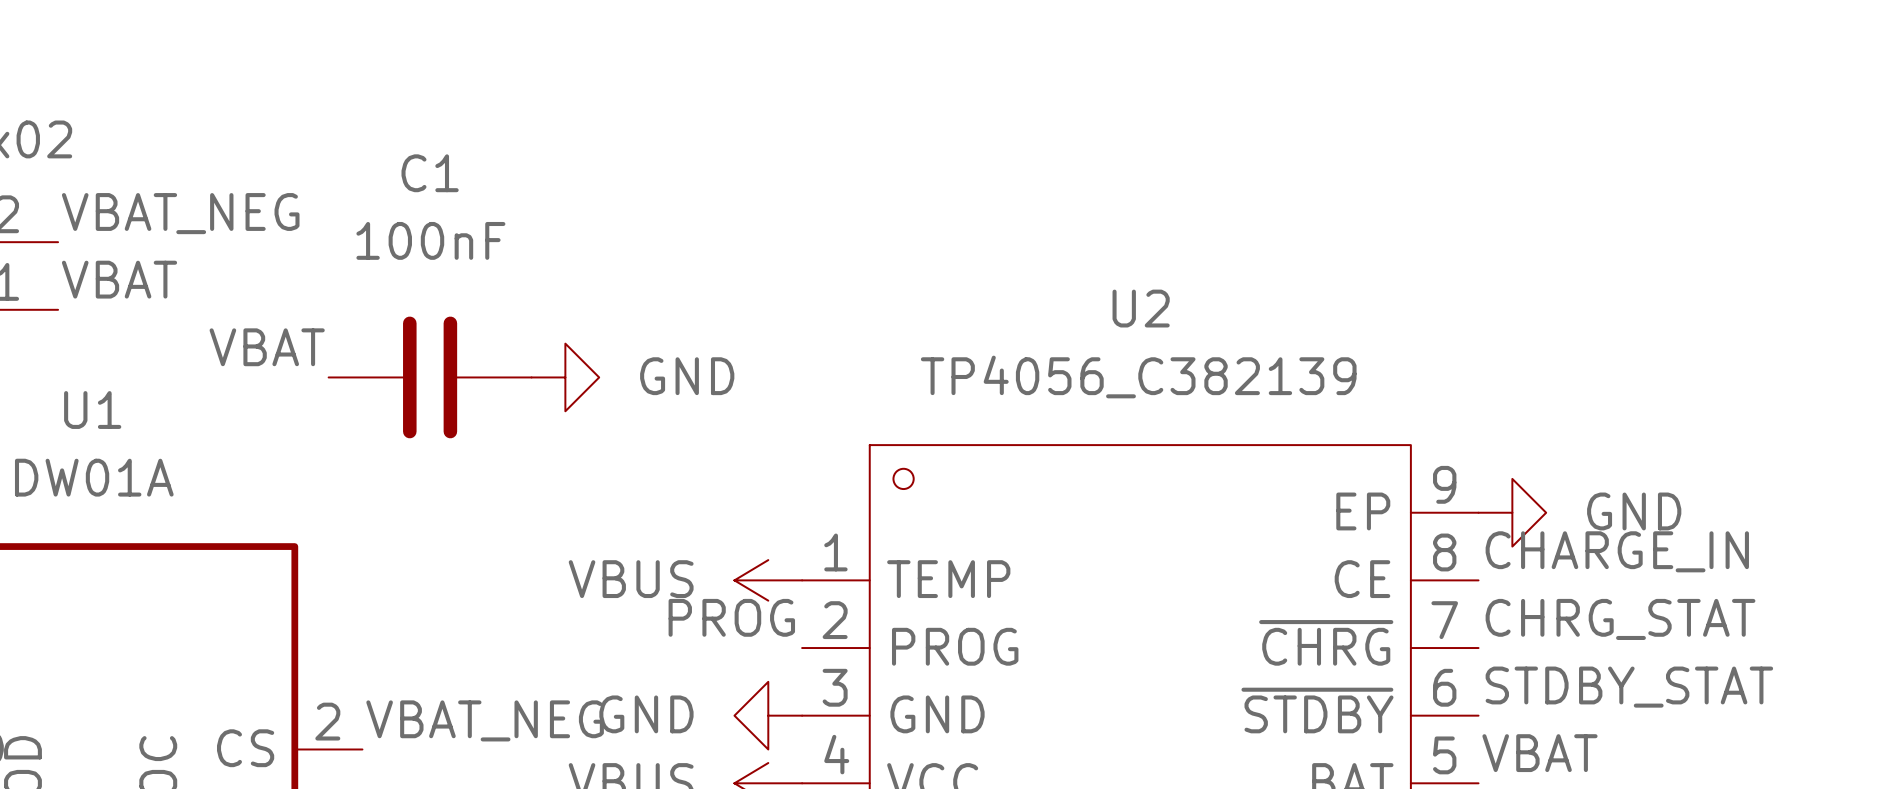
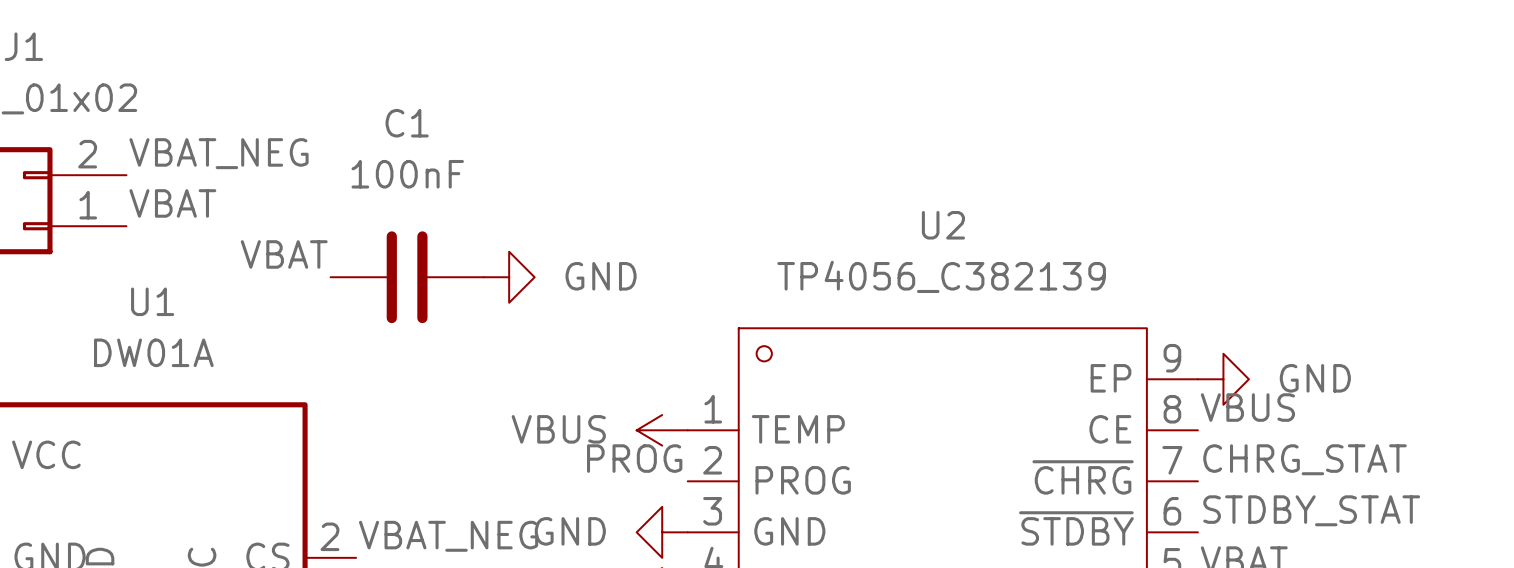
label: CHARGE_IN (1617, 551) -> VBUS (1247, 407)

